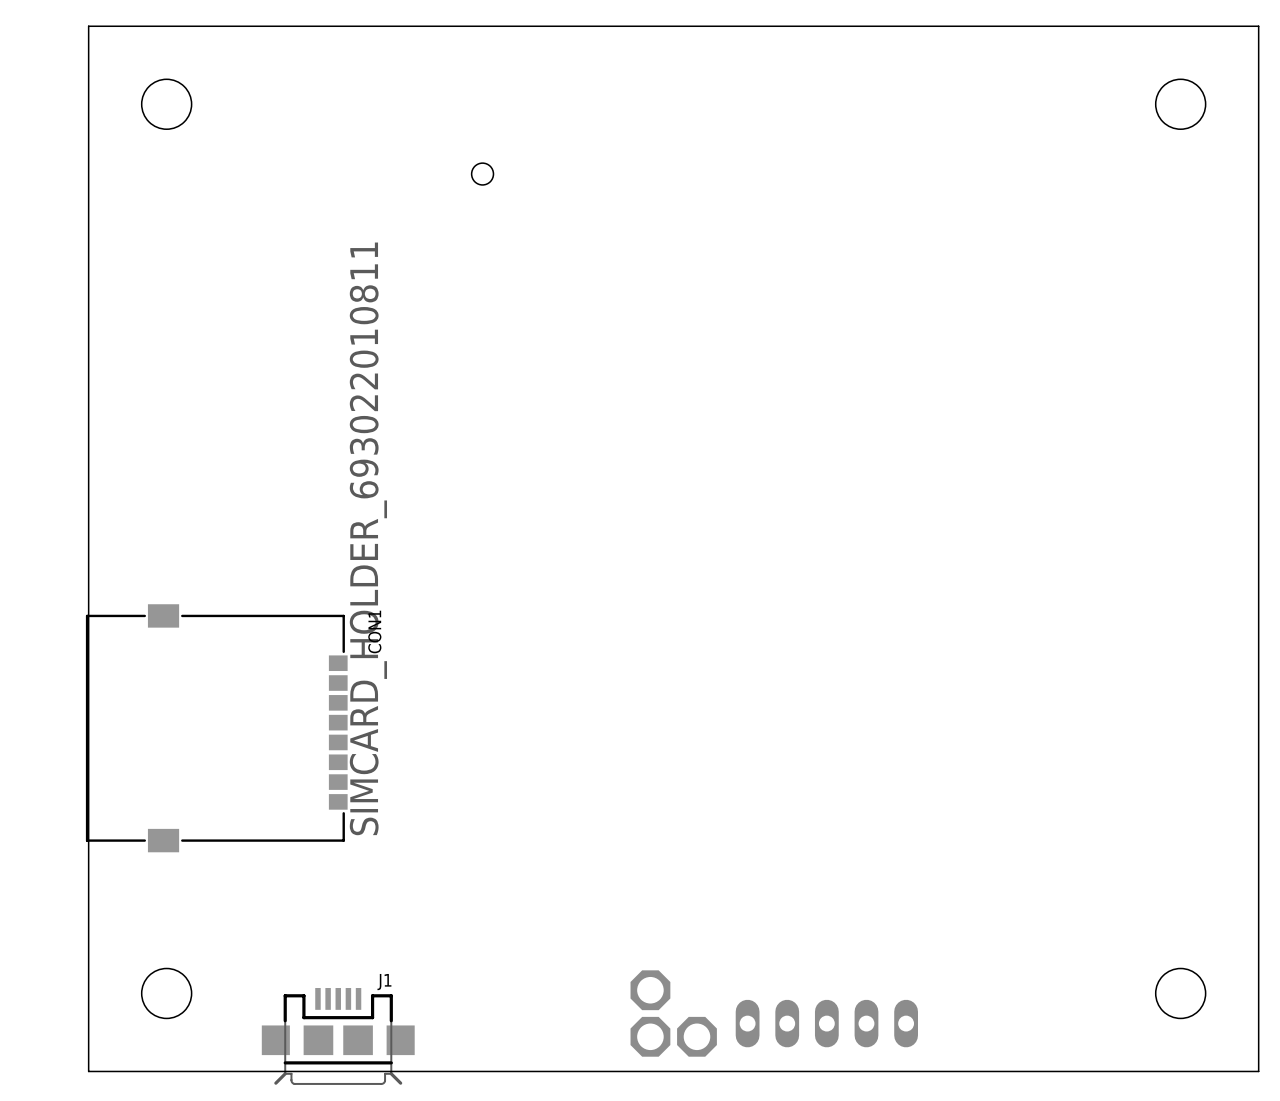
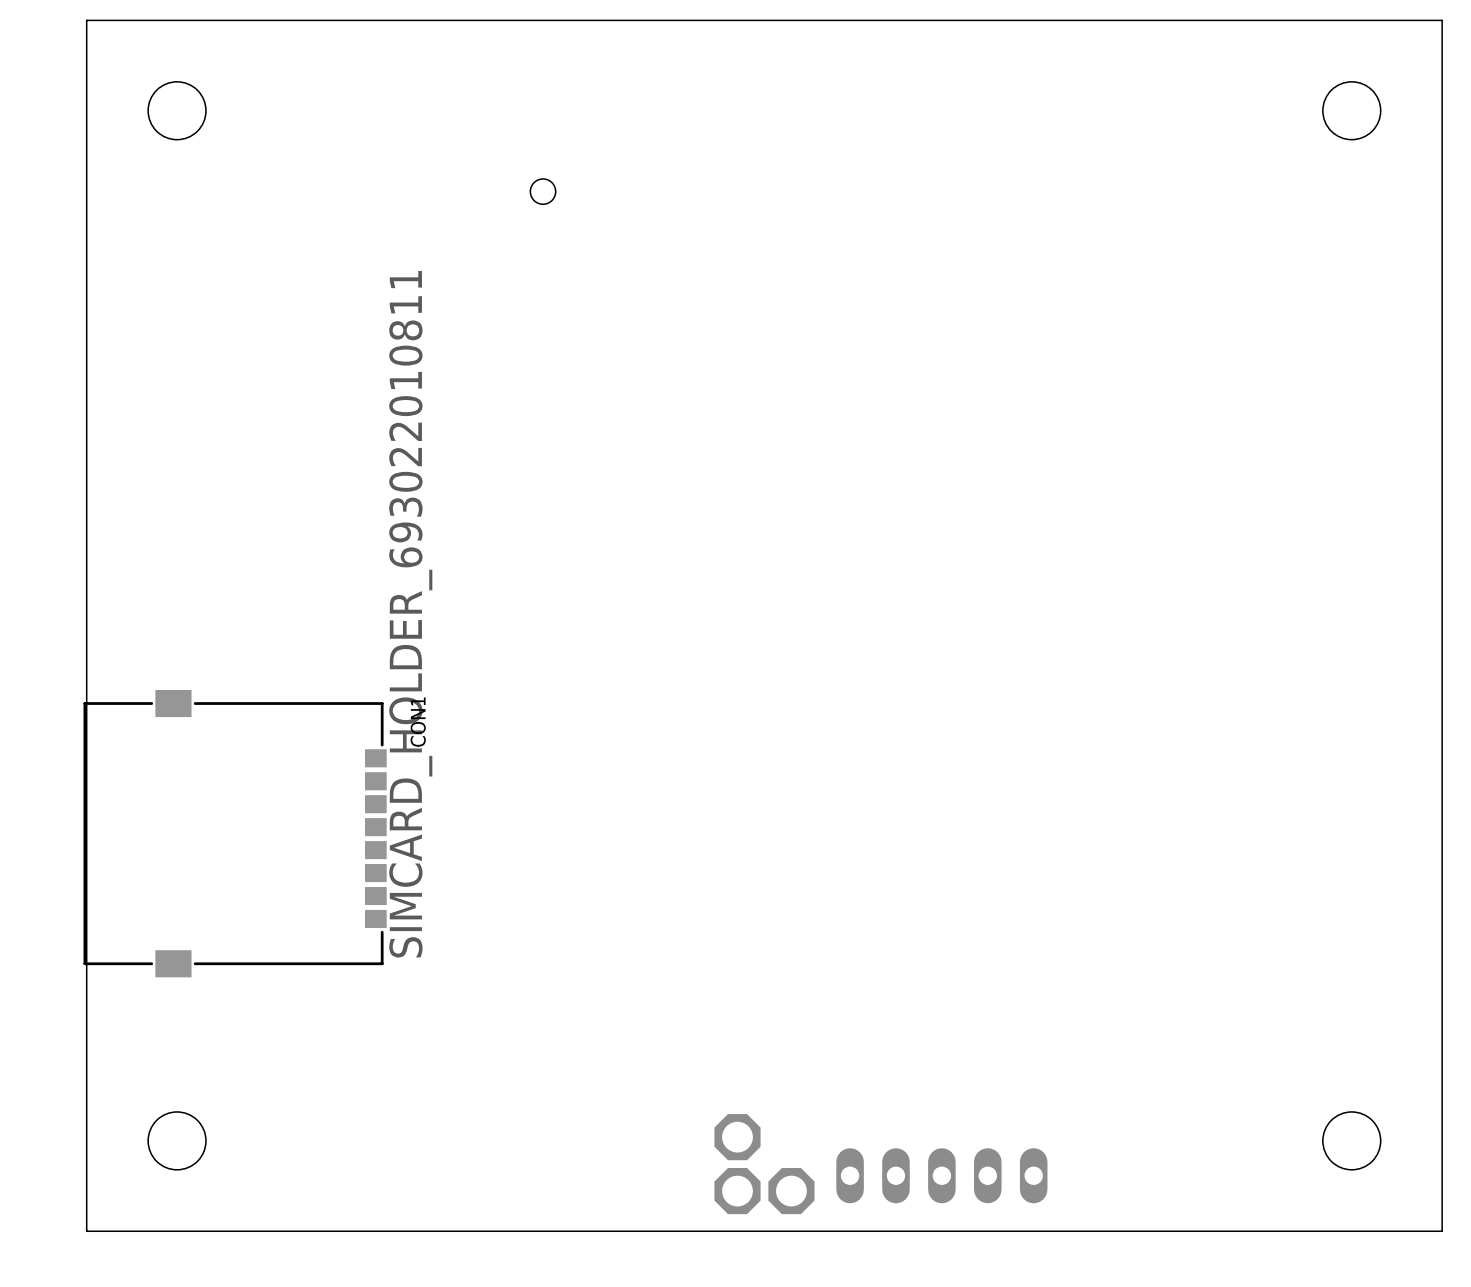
J1: (338, 1036) -> none

